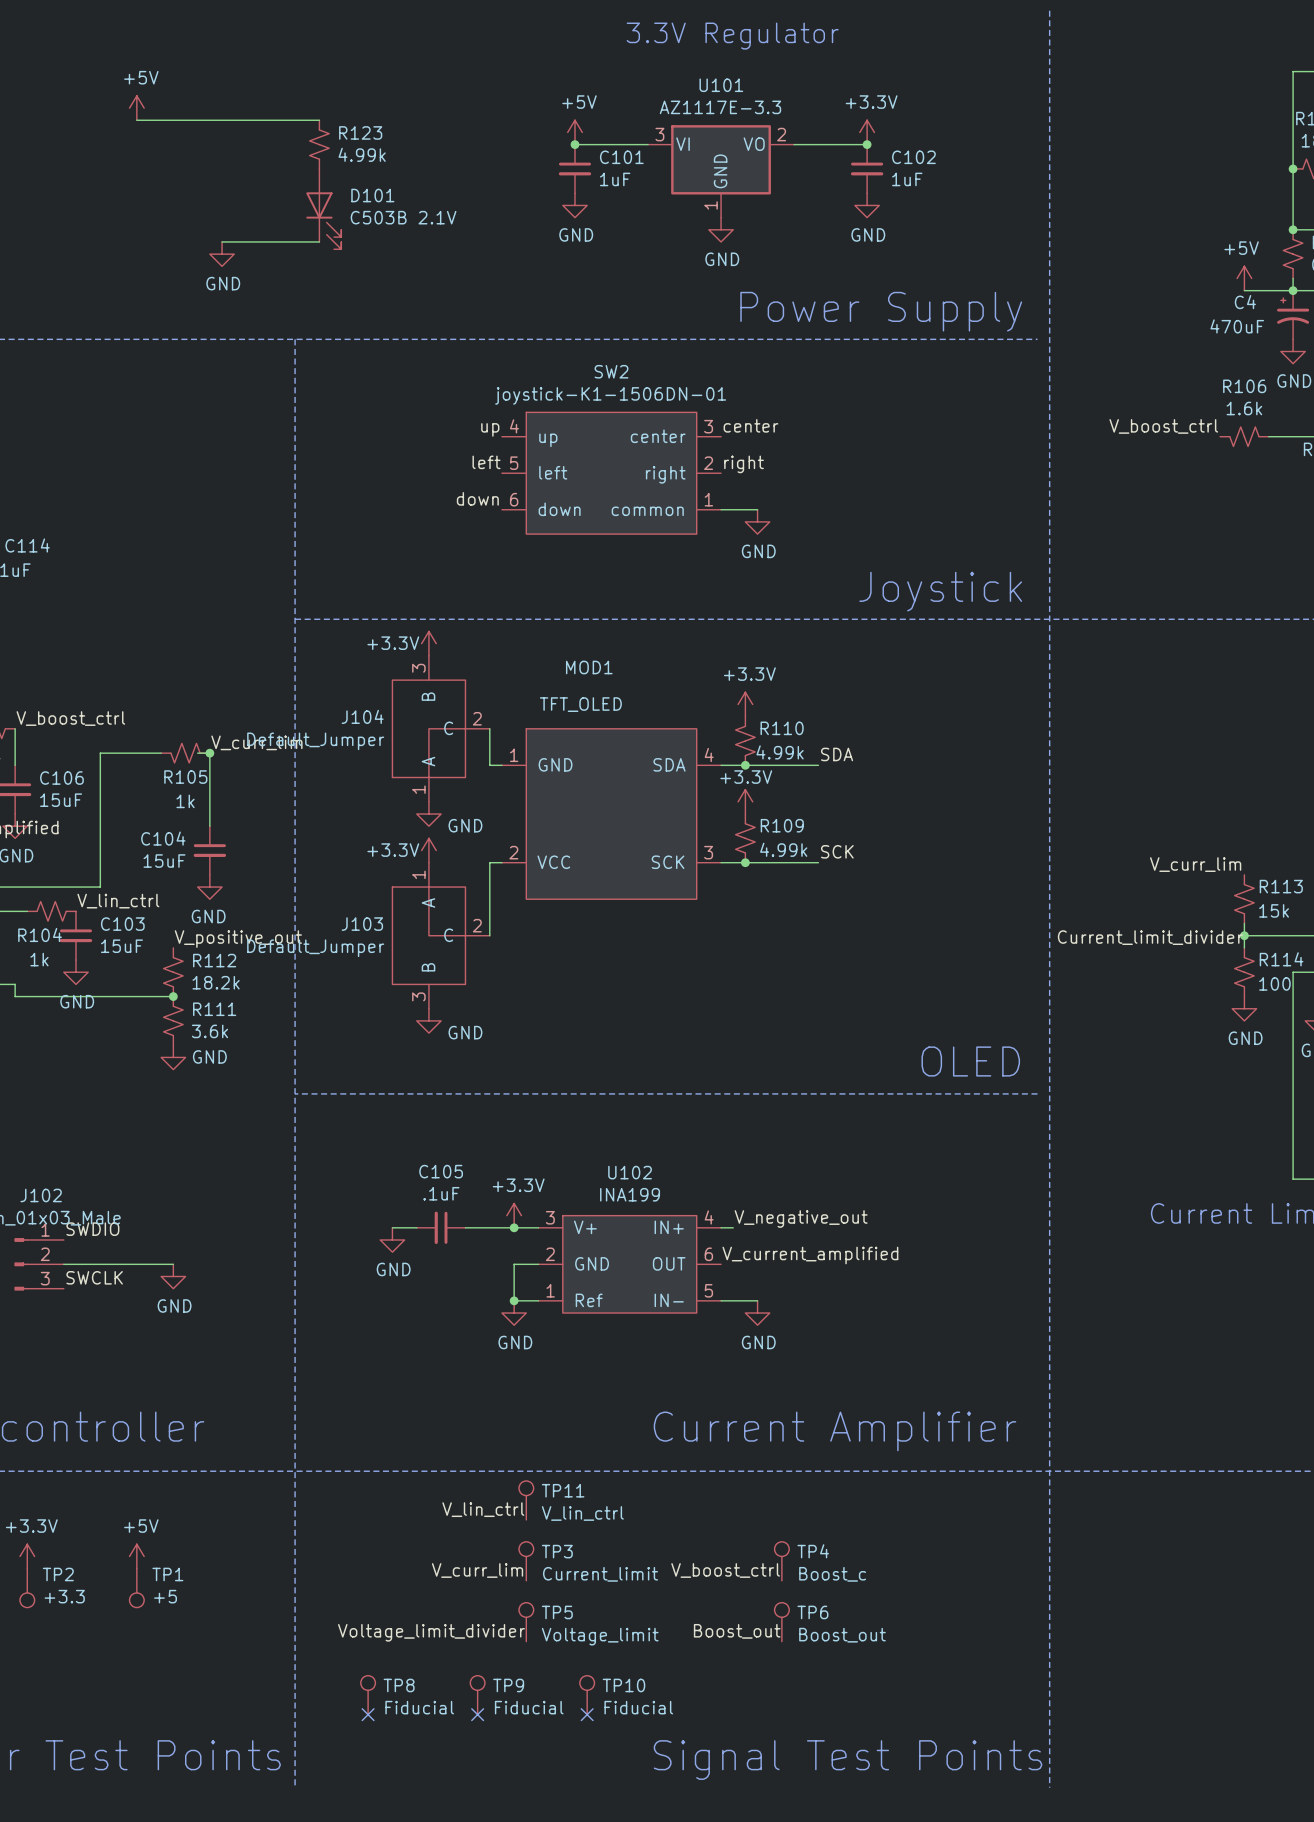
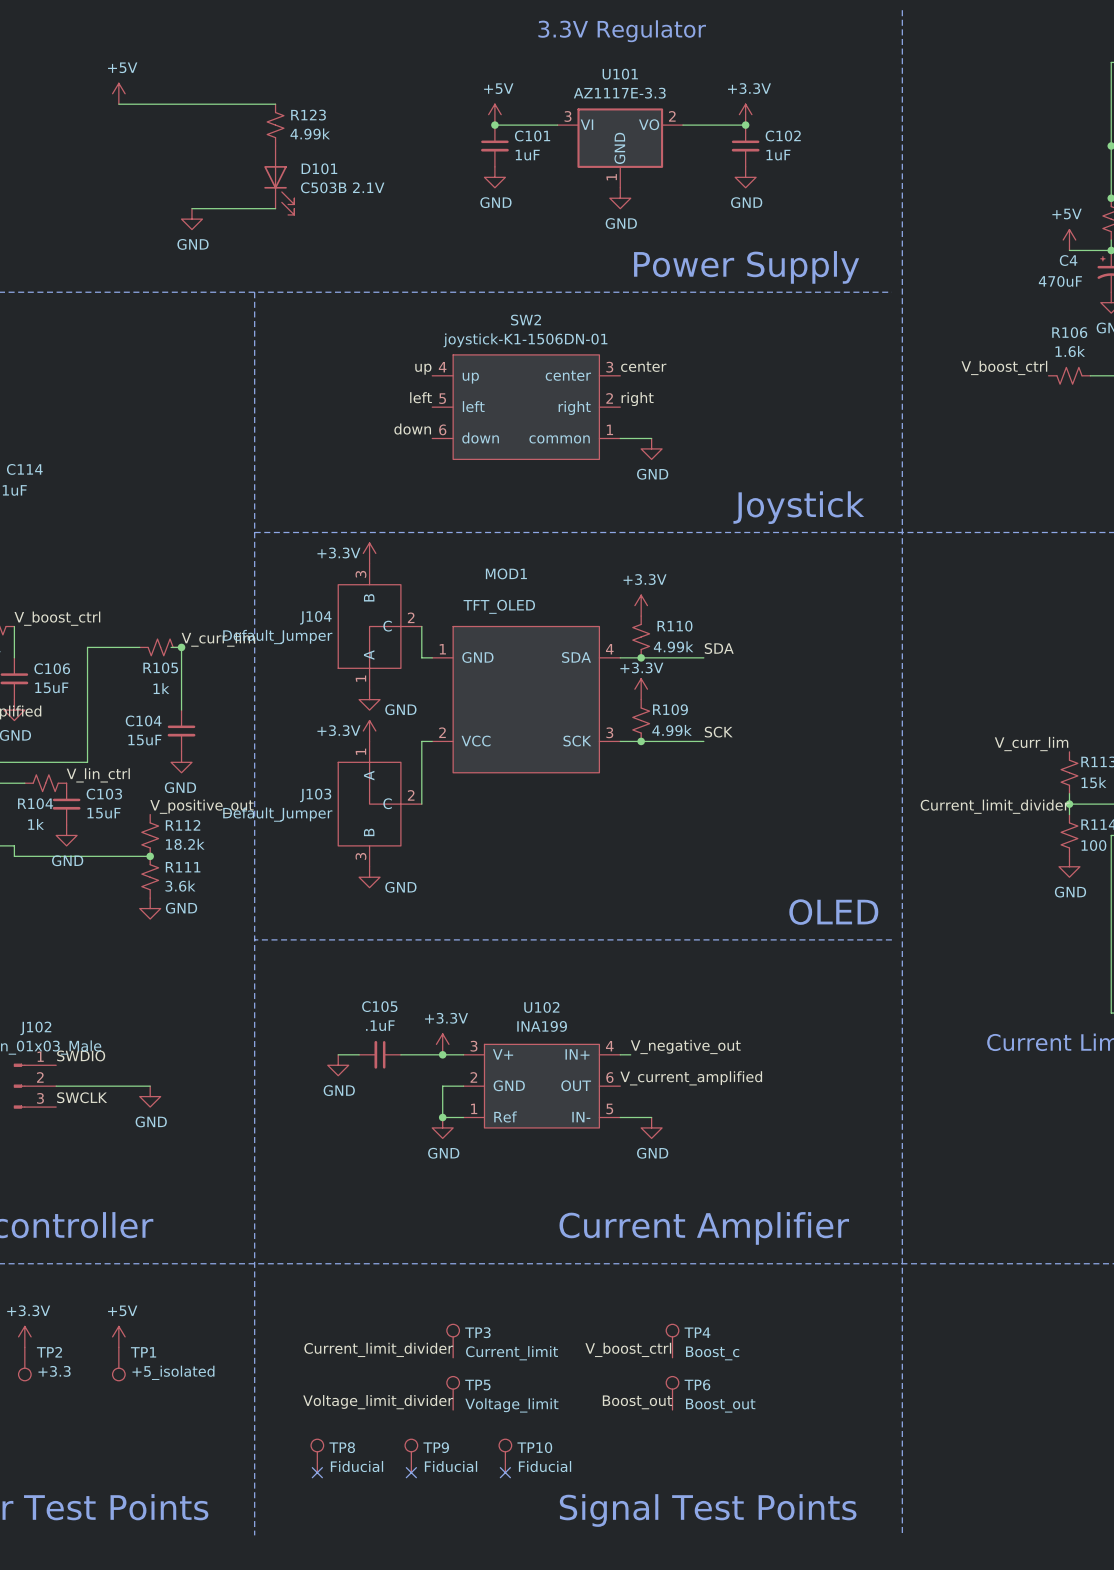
TP11: V_lin_ctrl (526, 1500) -> none
label: V_lin_ctrl (483, 1509) -> none
label: V_curr_lim (477, 1570) -> Current_limit_divider (378, 1349)
TP1 value: +5 (165, 1596) -> +5_isolated (173, 1372)

